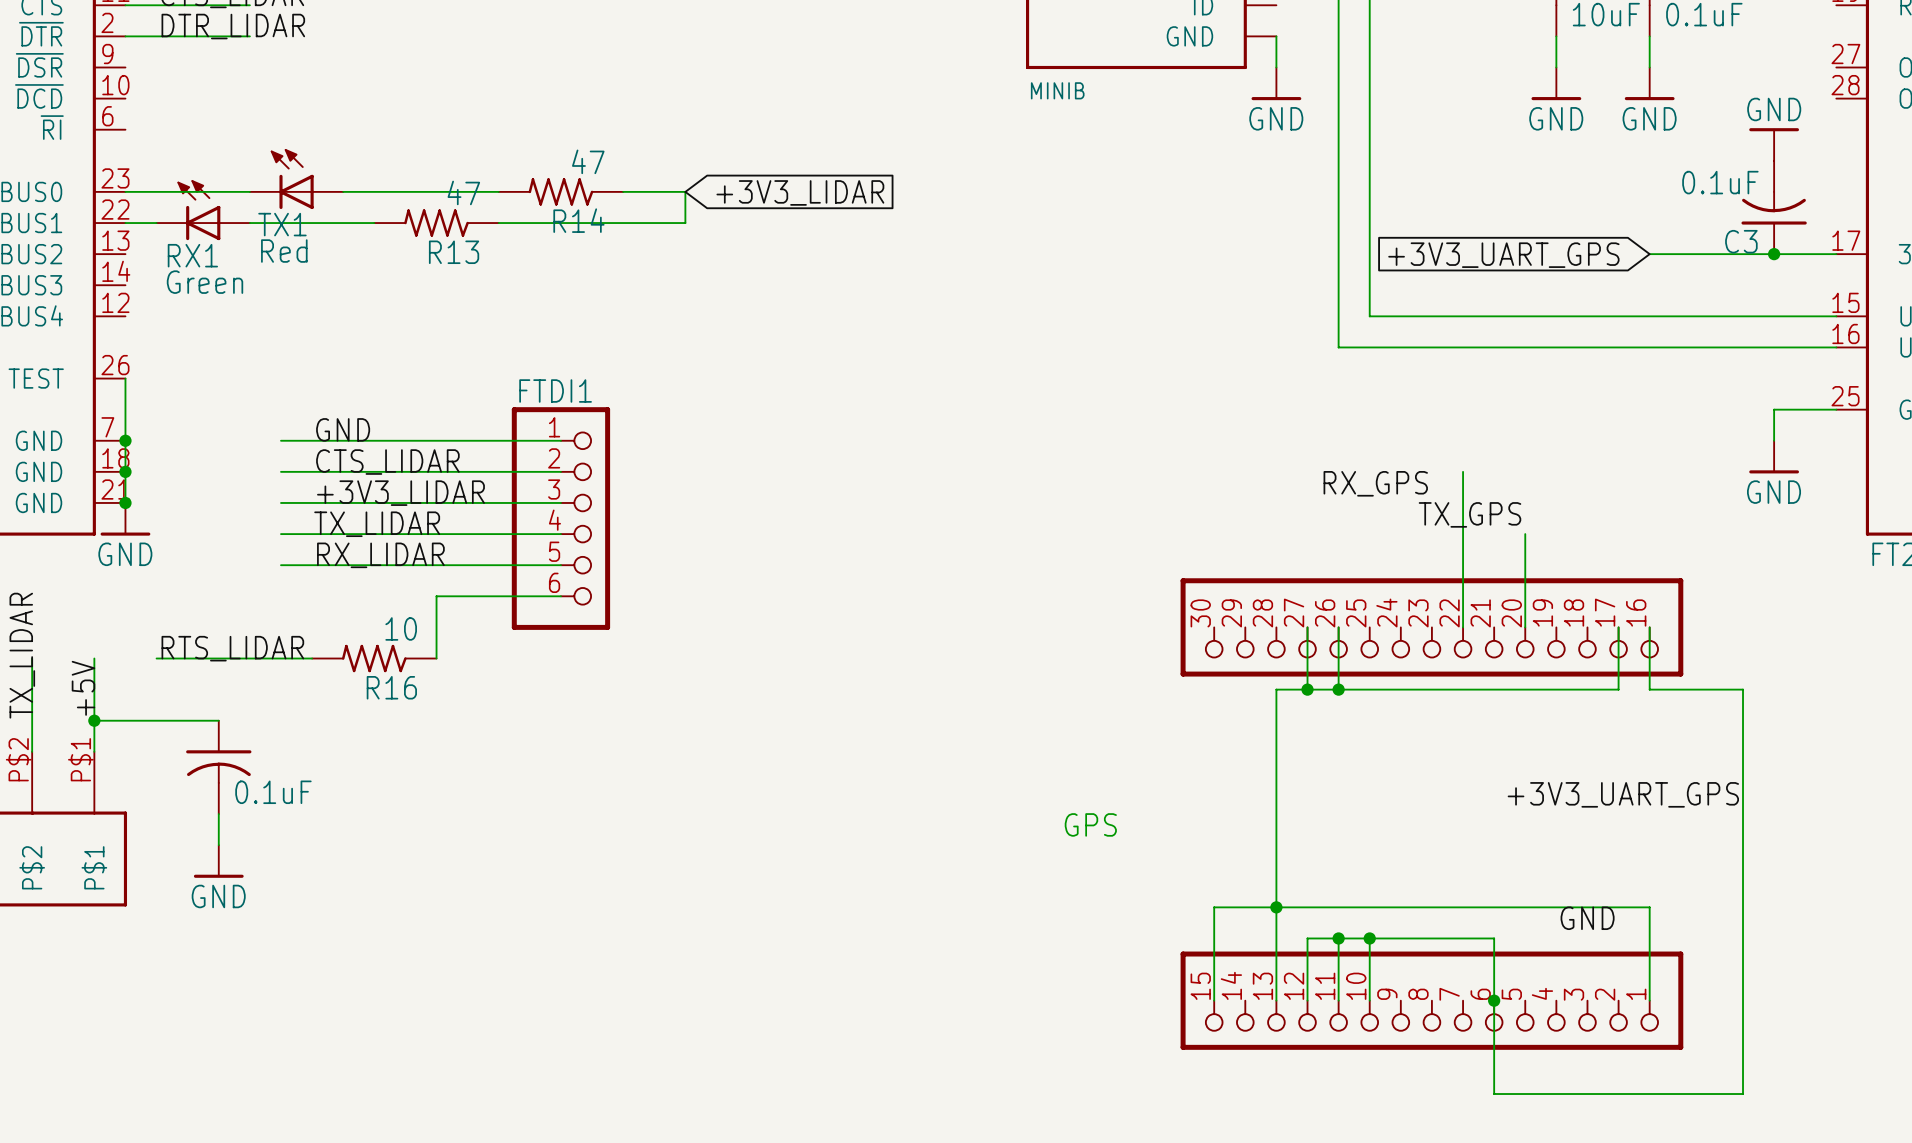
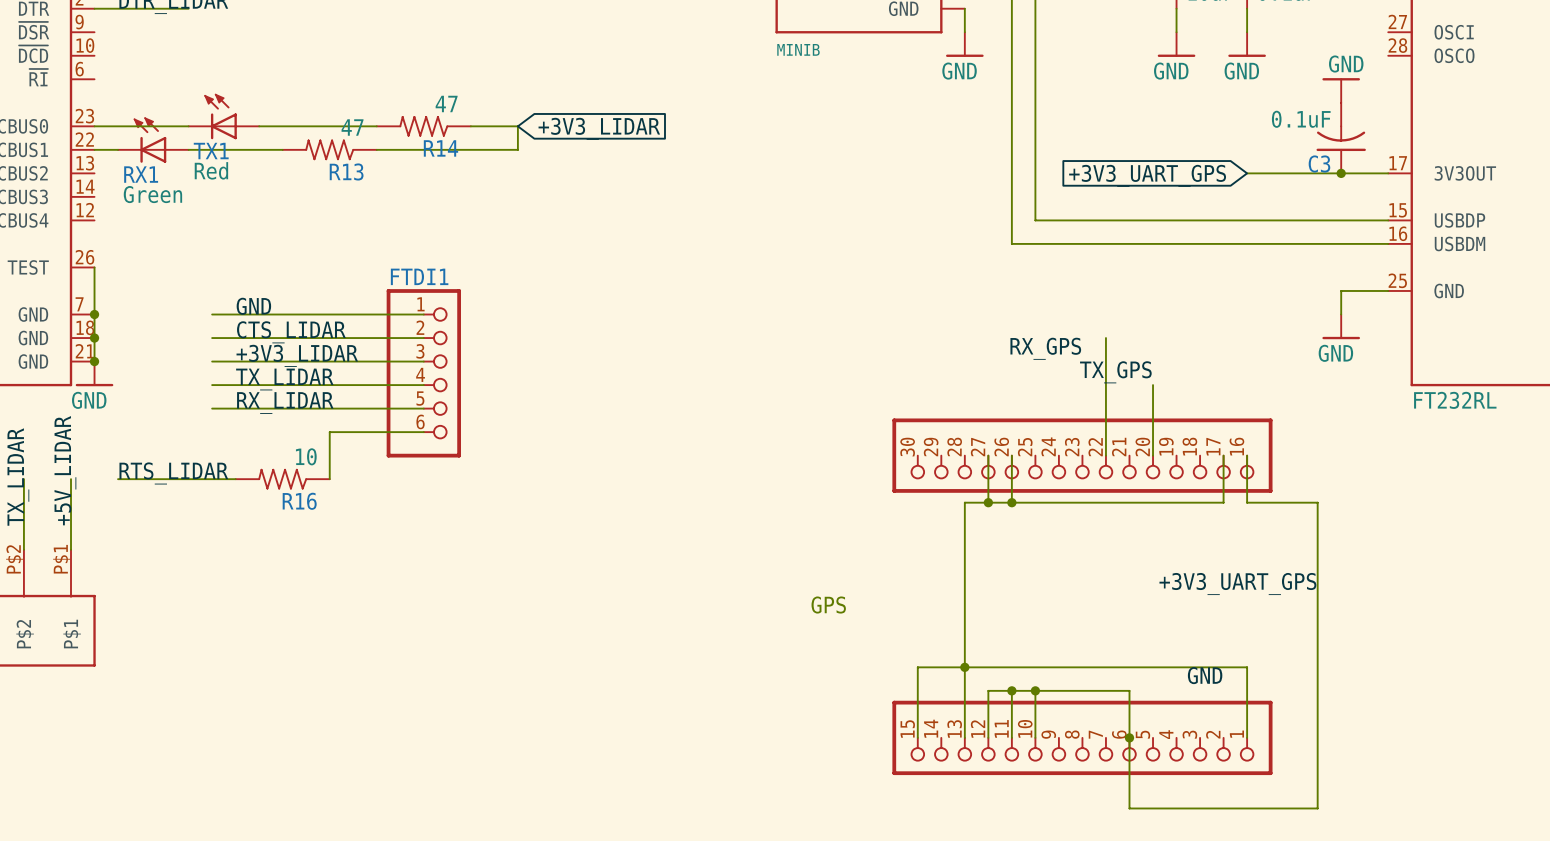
label: +5V (83, 688) -> +5V_LIDAR (65, 470)
wire: (94, 720) (218, 720) -> none
junction: (94, 720) -> none
part: 0.1uF (218, 767) -> none
wire: (218, 814) (218, 845) -> none
power symbol: GND (218, 861) -> none

